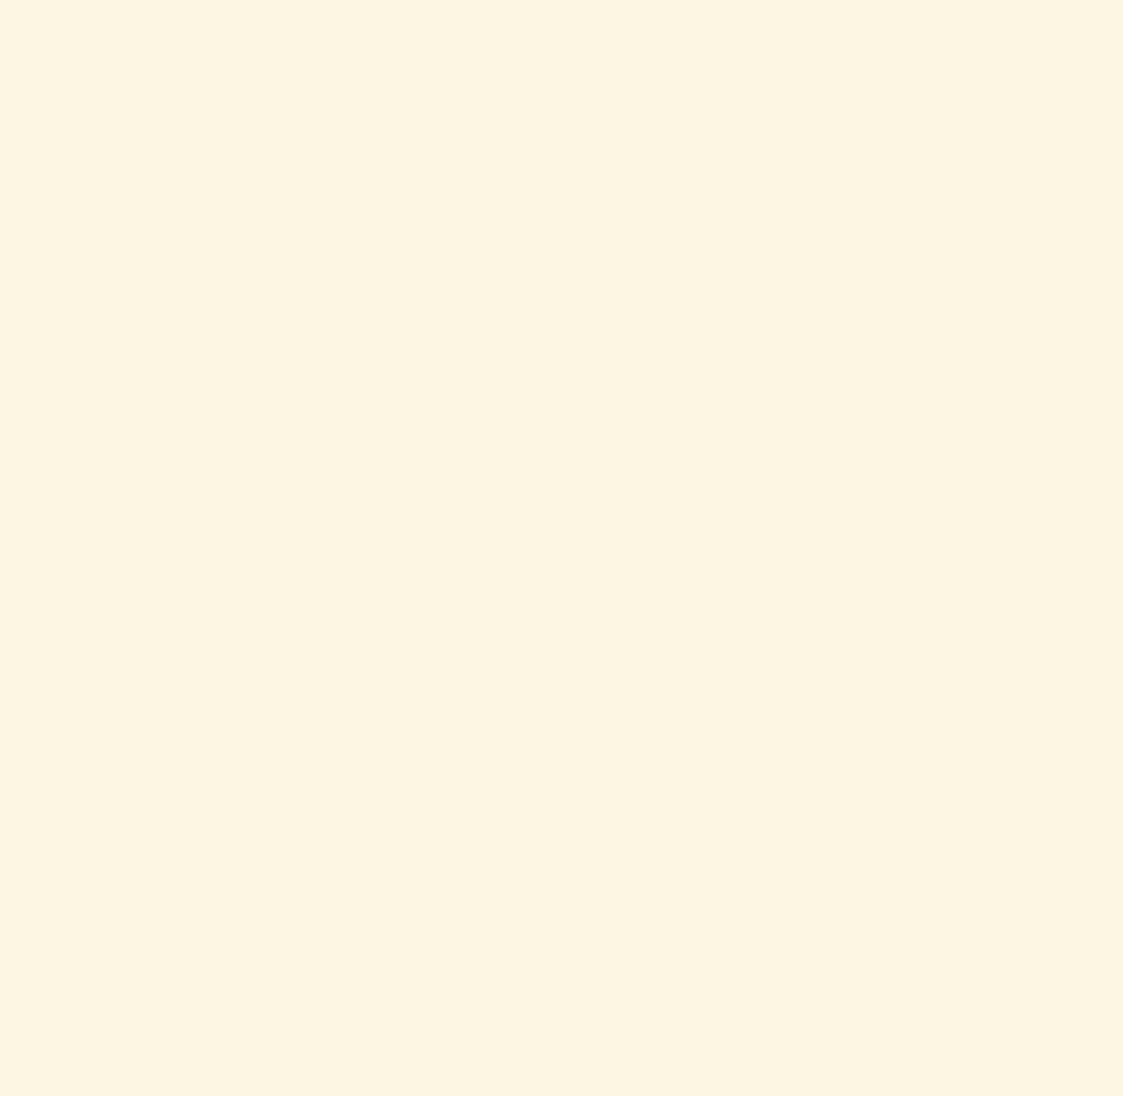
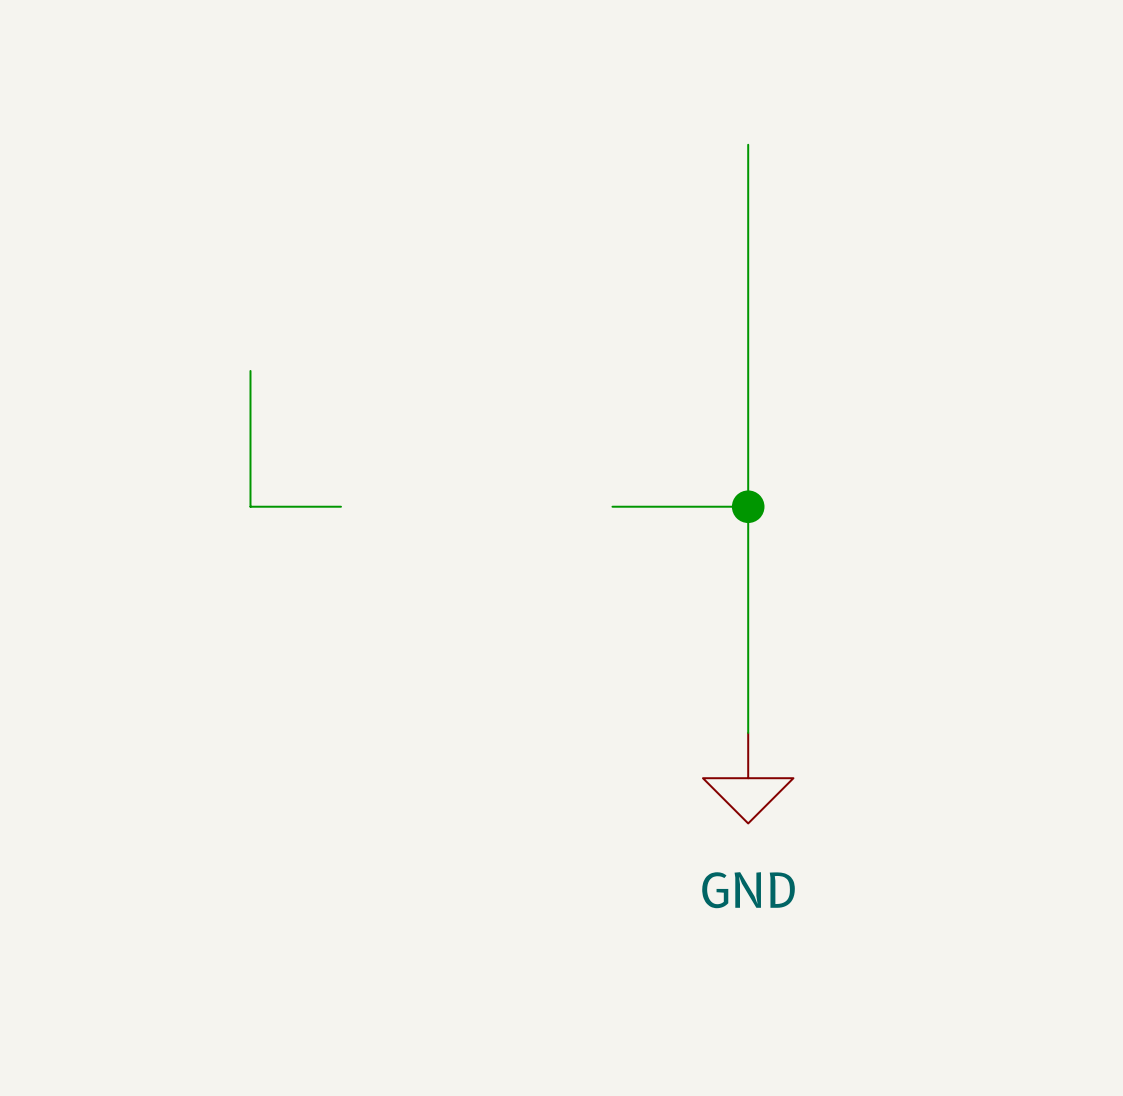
wire: none -> (748, 144) (748, 732)
wire: none -> (250, 370) (250, 506) (340, 506)
wire: none -> (612, 506) (748, 506)
junction: none -> (748, 506)
power symbol: none -> GND (748, 778)

